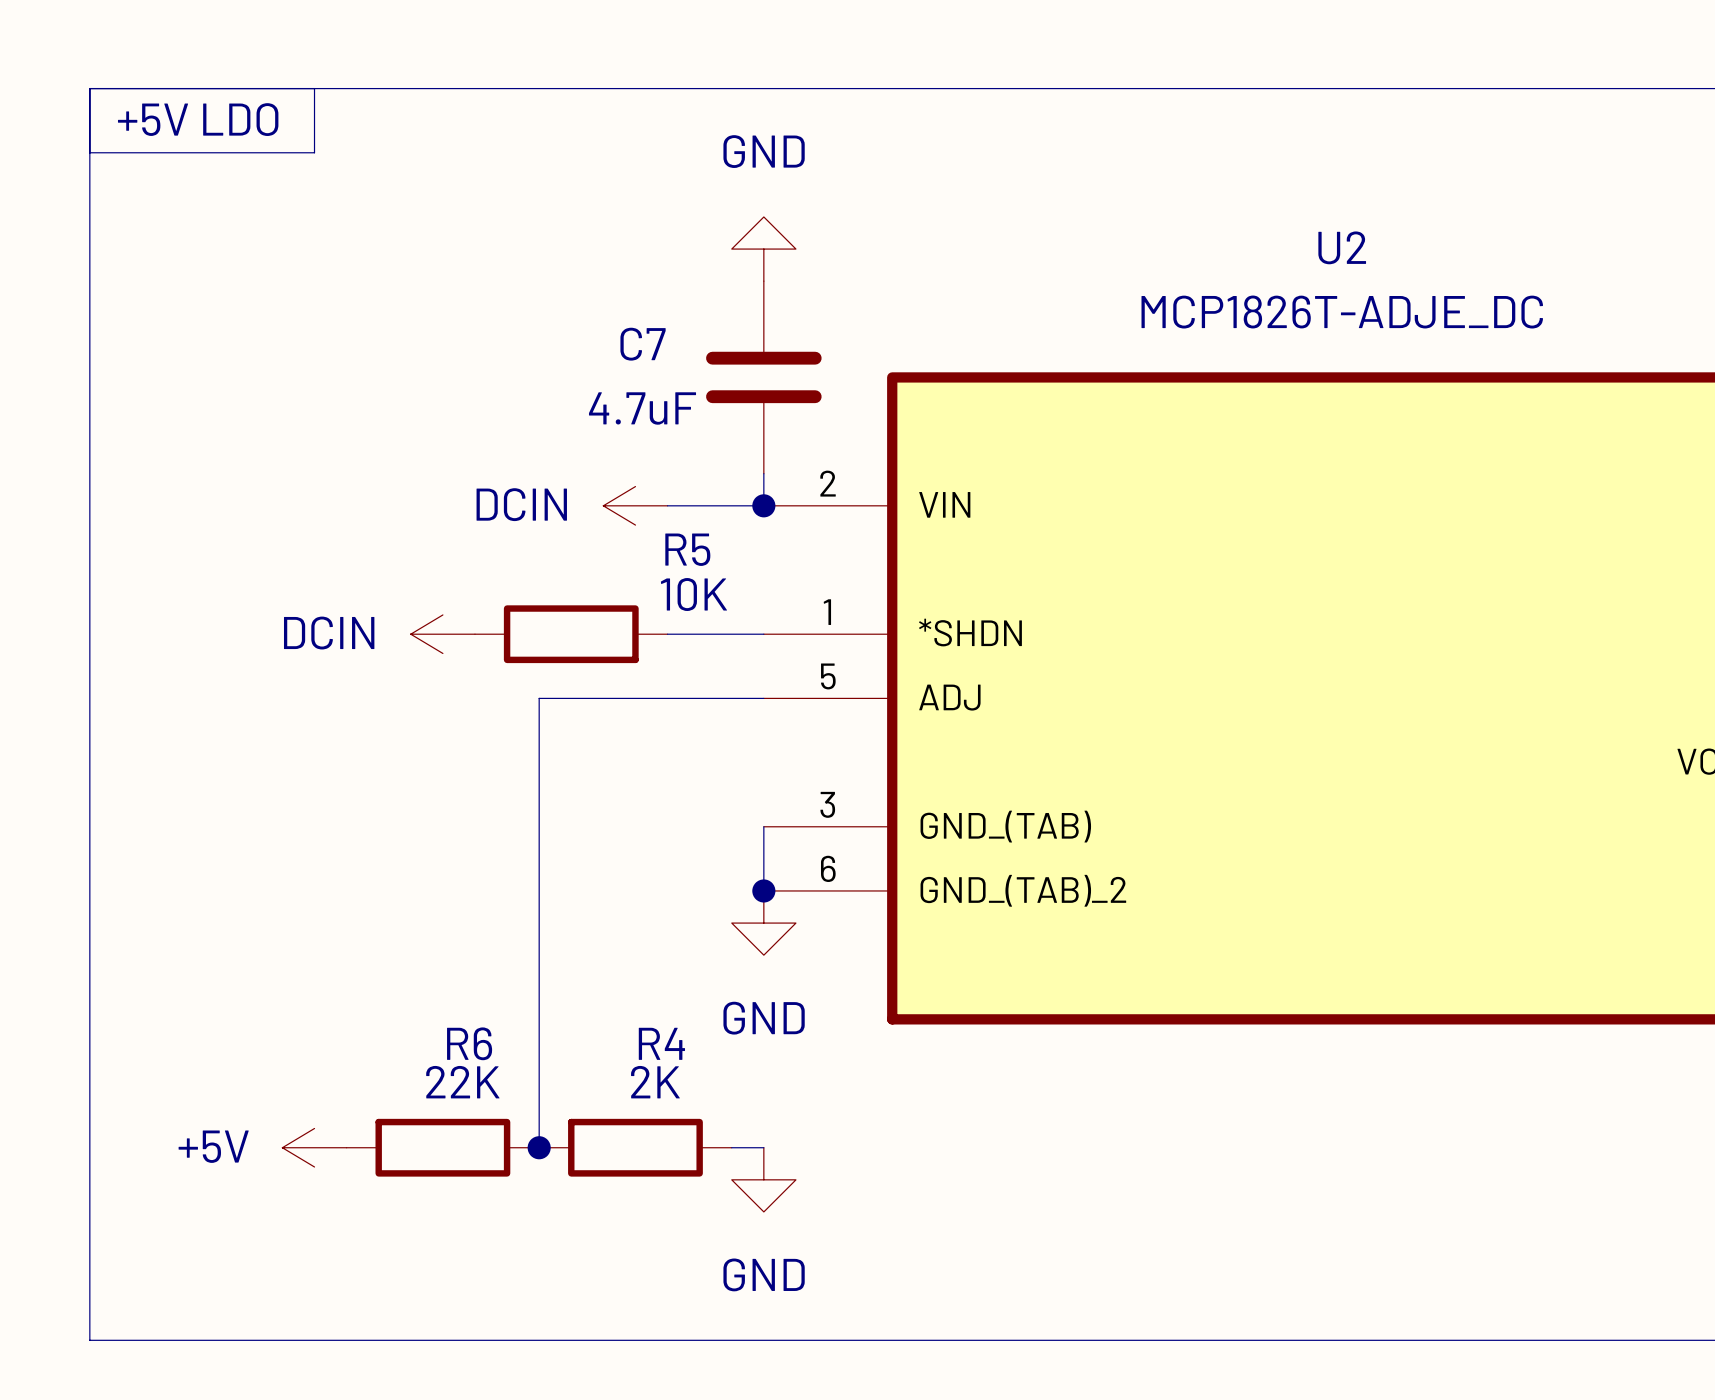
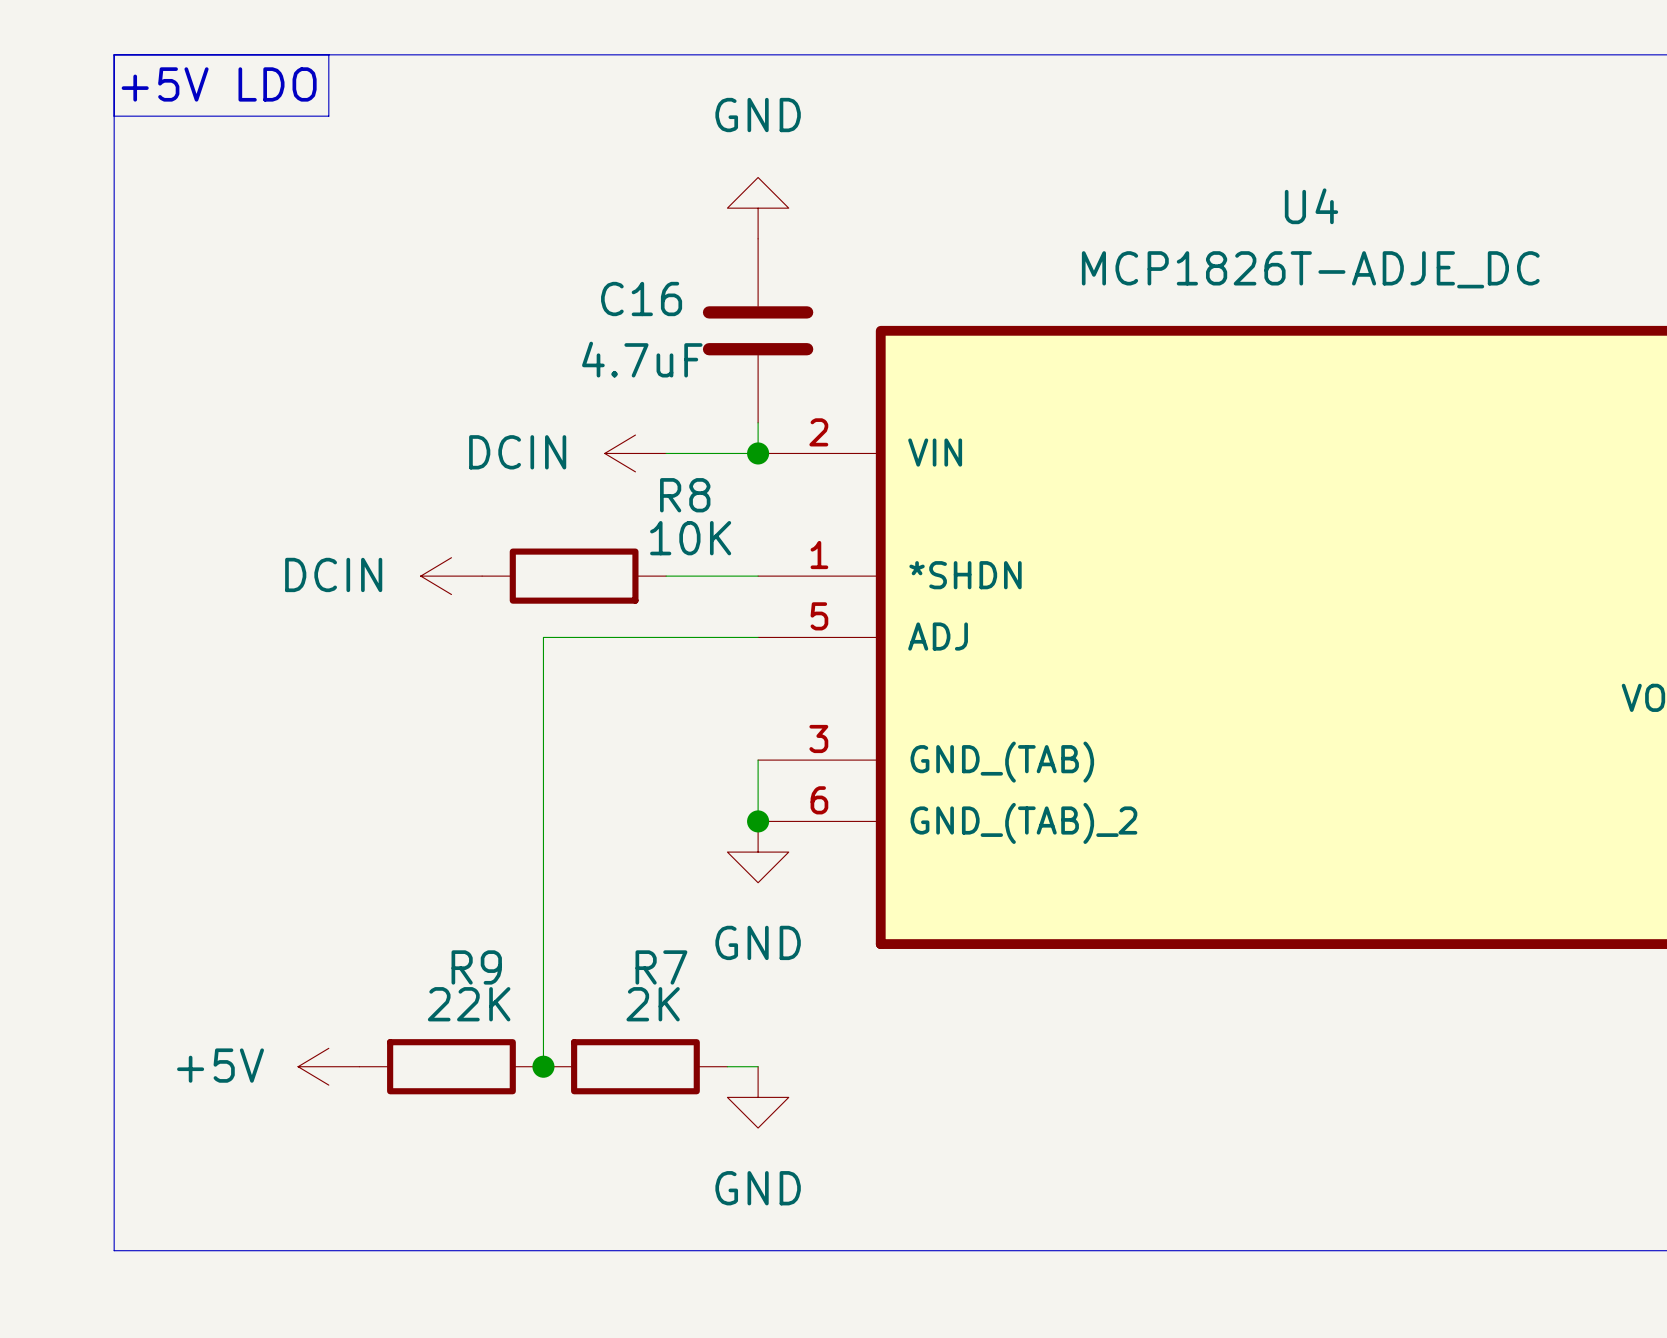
U2 name: U2 (1342, 247) -> U4 (1311, 206)
C7 name: C7 (643, 344) -> C16 (641, 299)
R5 name: R5 (687, 549) -> R8 (685, 495)
R6 name: R6 (469, 1043) -> R9 (476, 967)
R4 name: R4 (661, 1043) -> R7 (661, 967)

